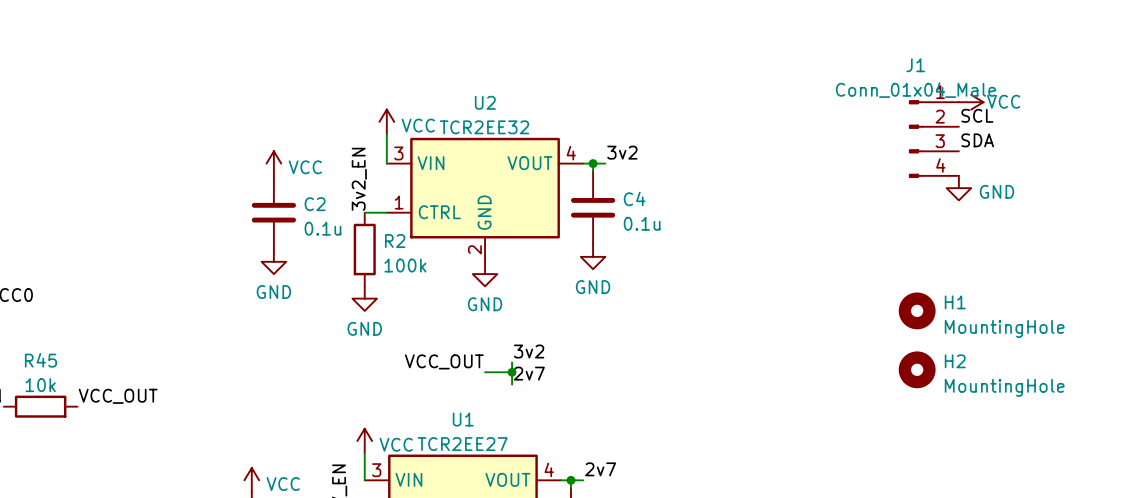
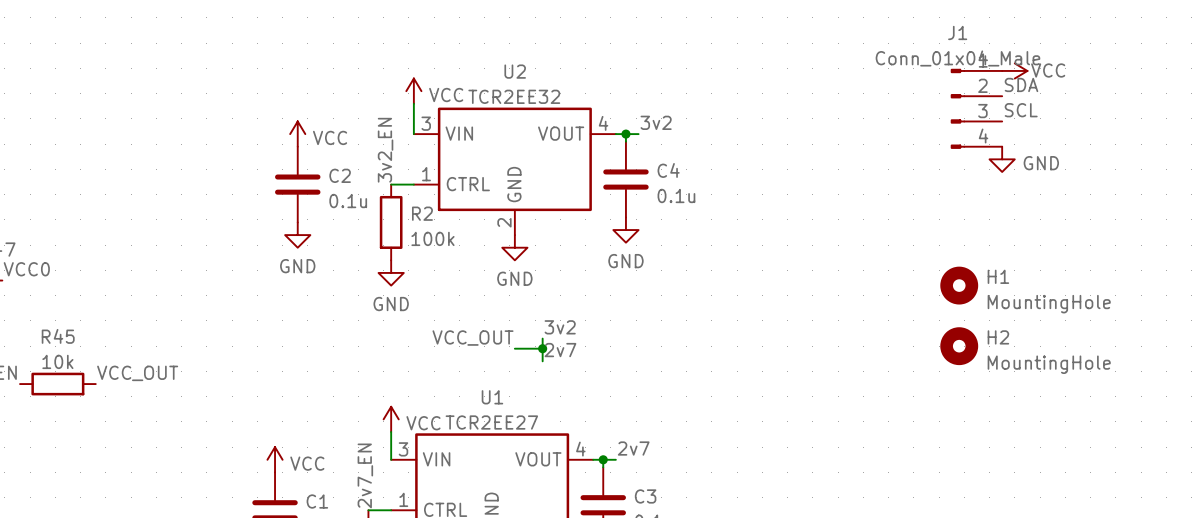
label: SCL (977, 115) -> SDA (1021, 84)
label: SDA (977, 140) -> SCL (1021, 110)

